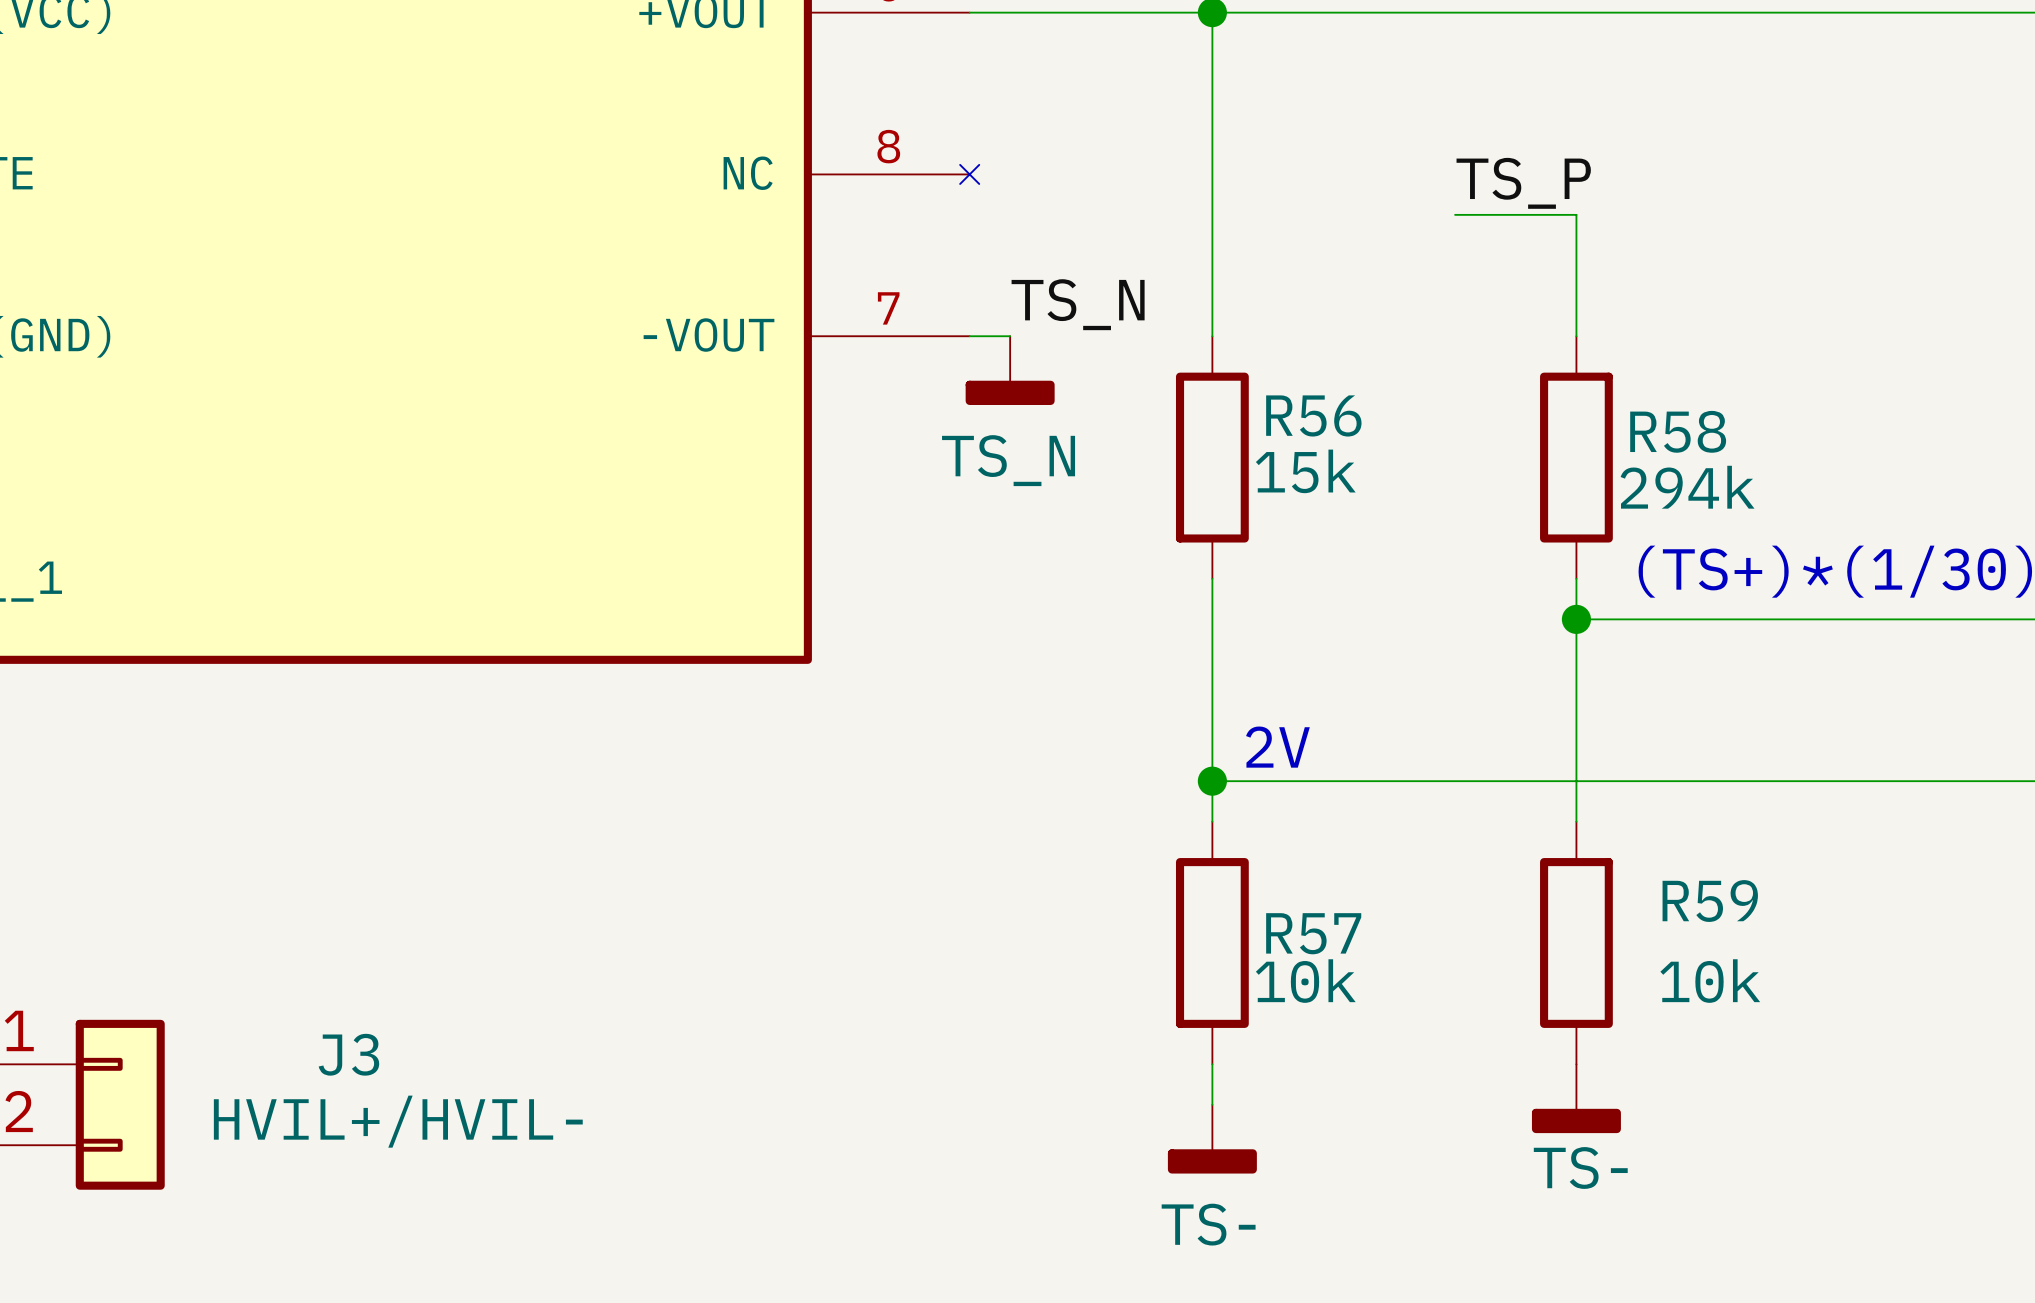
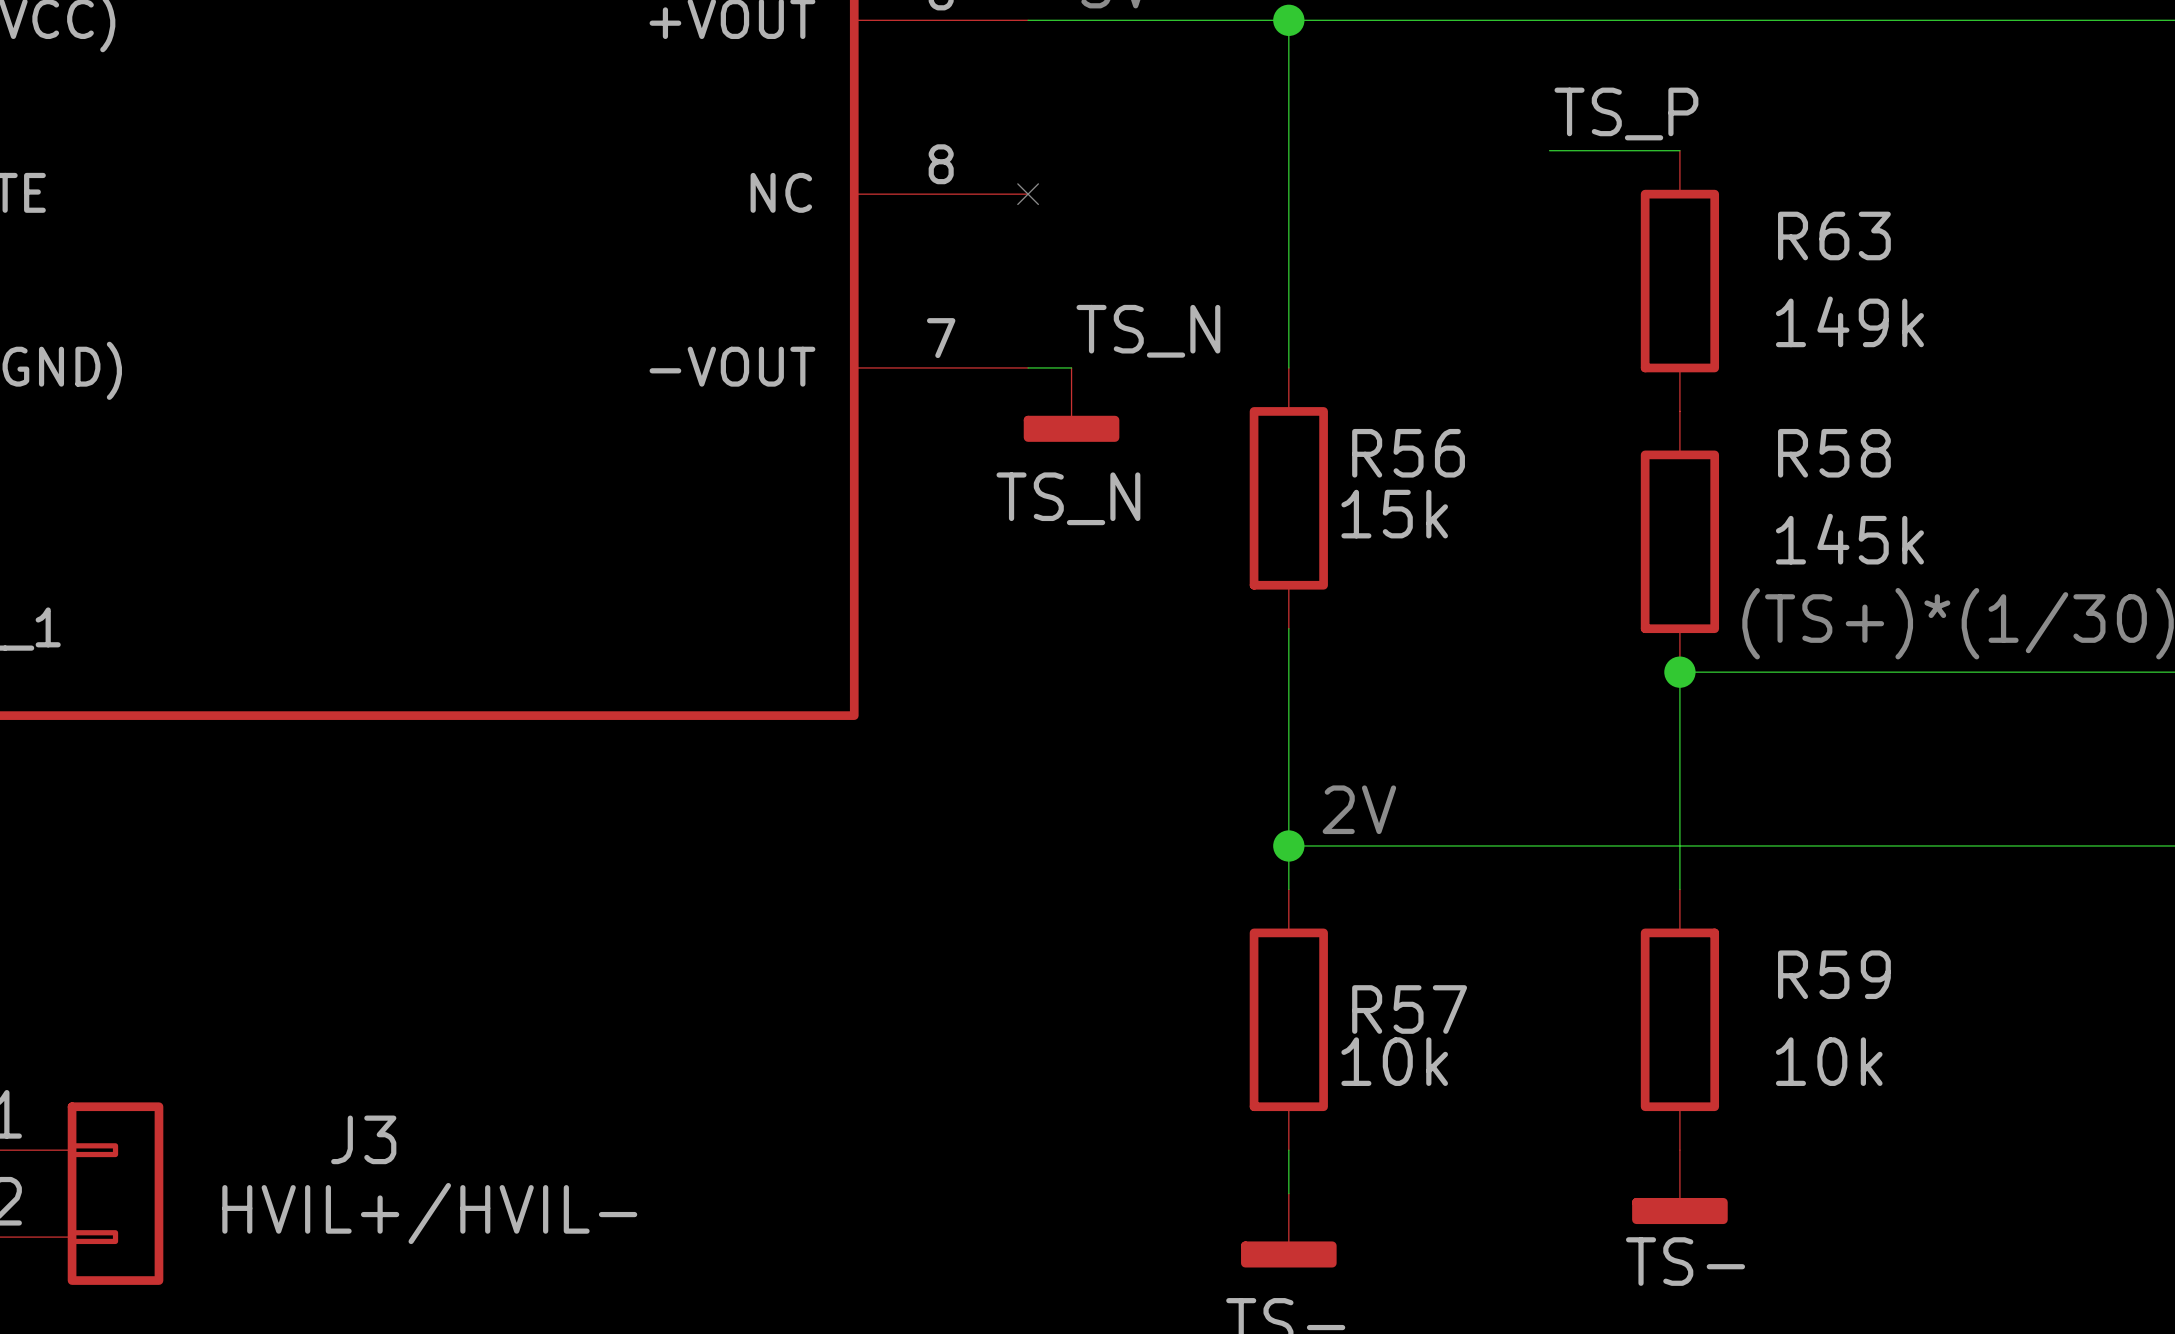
wire: none -> (1549, 150) (1679, 150)
label position: TS_P (1523, 183) -> TS_P (1626, 113)
wire: (1455, 214) (1576, 214) (1576, 336) -> none
R63: none -> 149k (1679, 281)
R58 name position: R58 (1678, 431) -> R58 (1834, 453)
R58 position: (1576, 457) -> (1679, 541)
R58 value: 294k (1687, 487) -> 145k (1849, 539)

